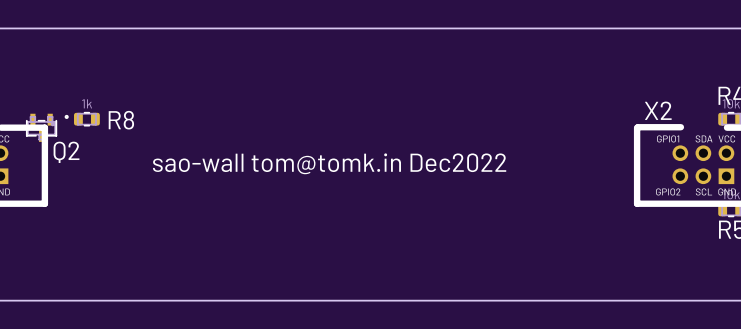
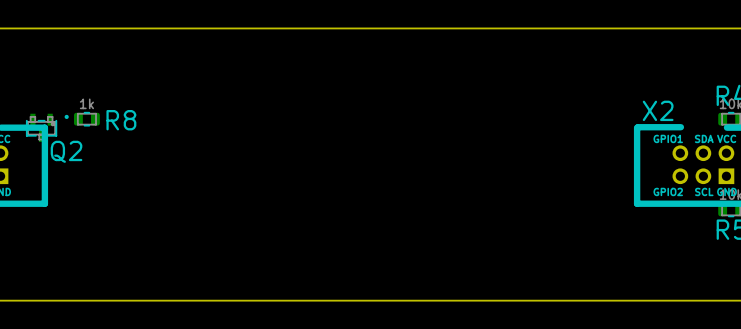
text: sao-wall tom@tomk.in Dec2022 (329, 163) -> none

